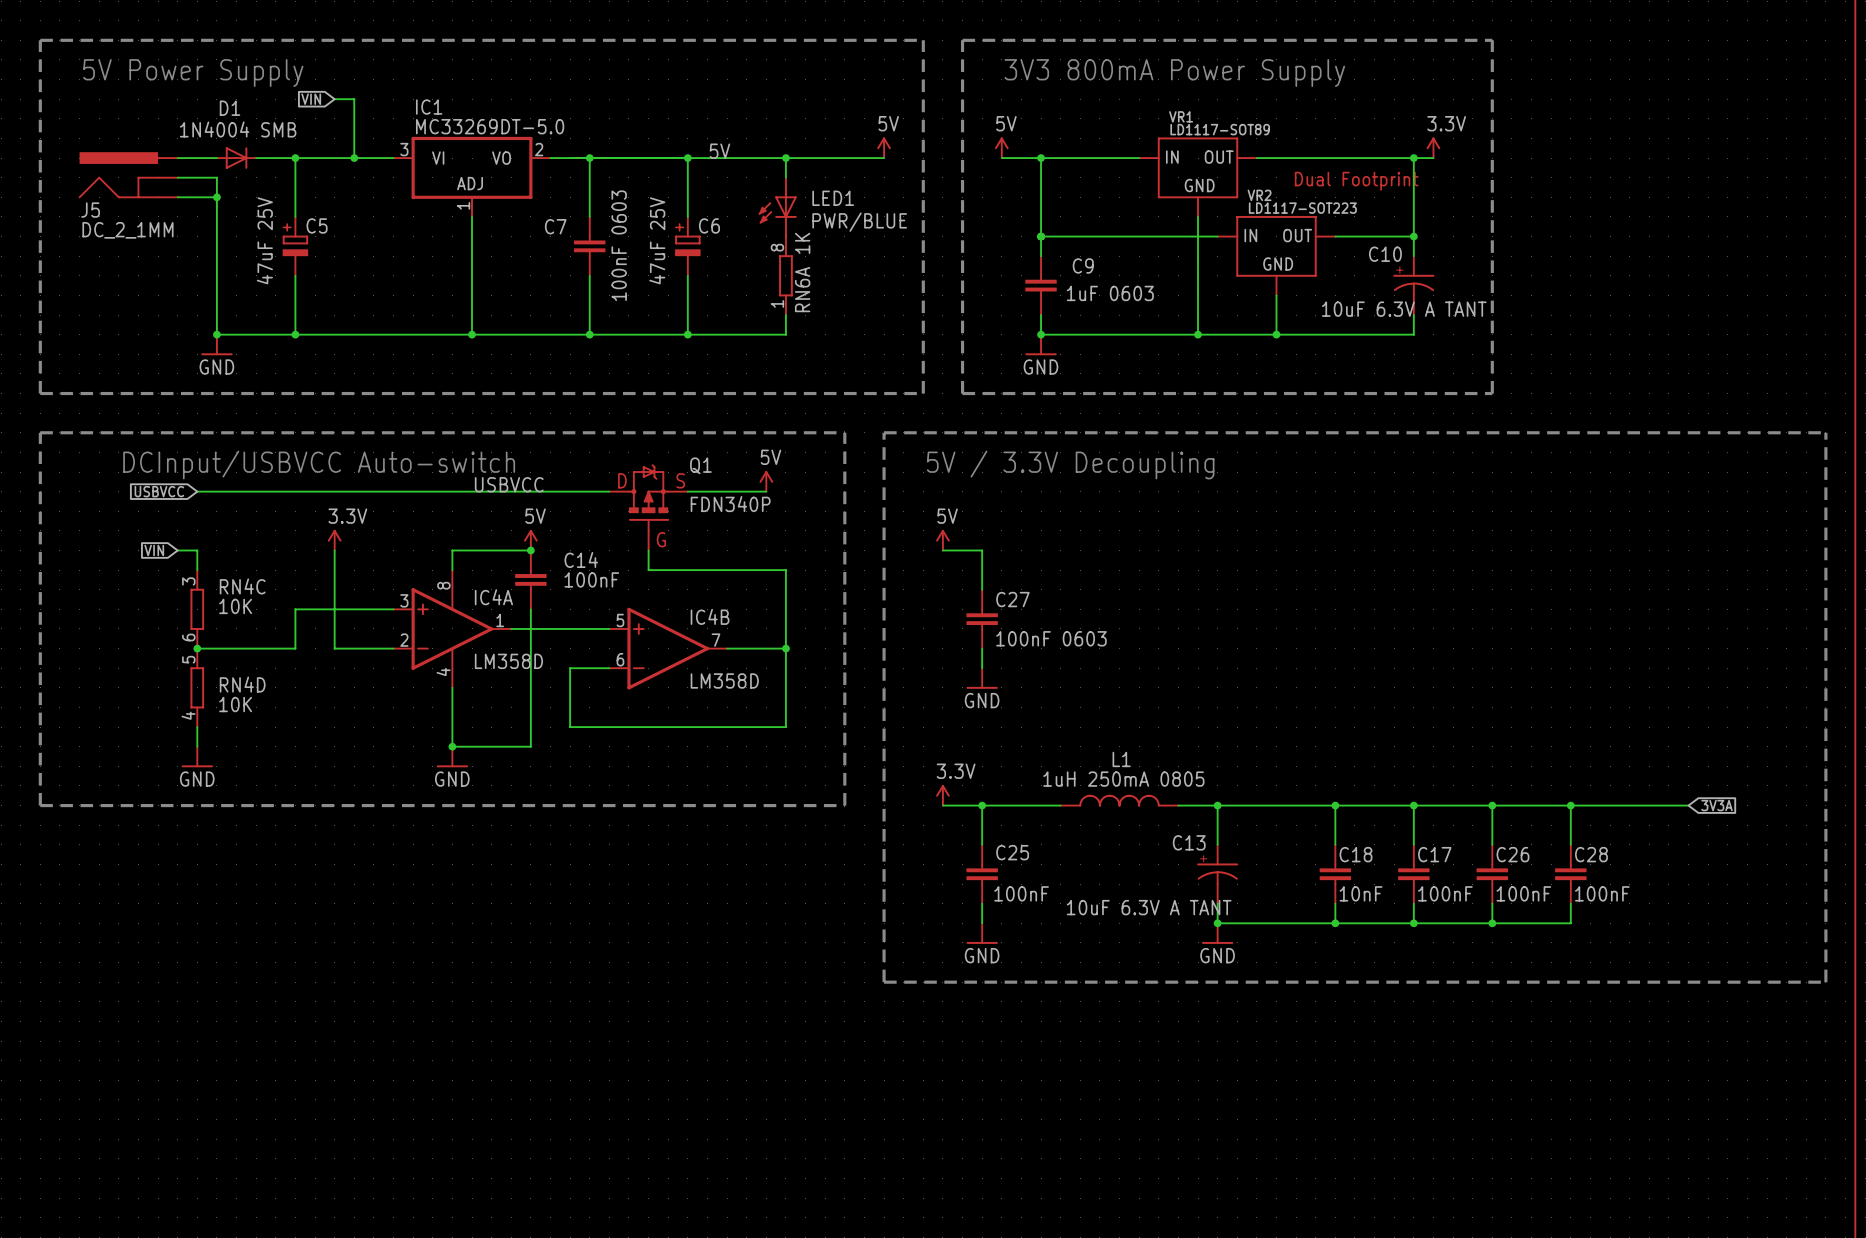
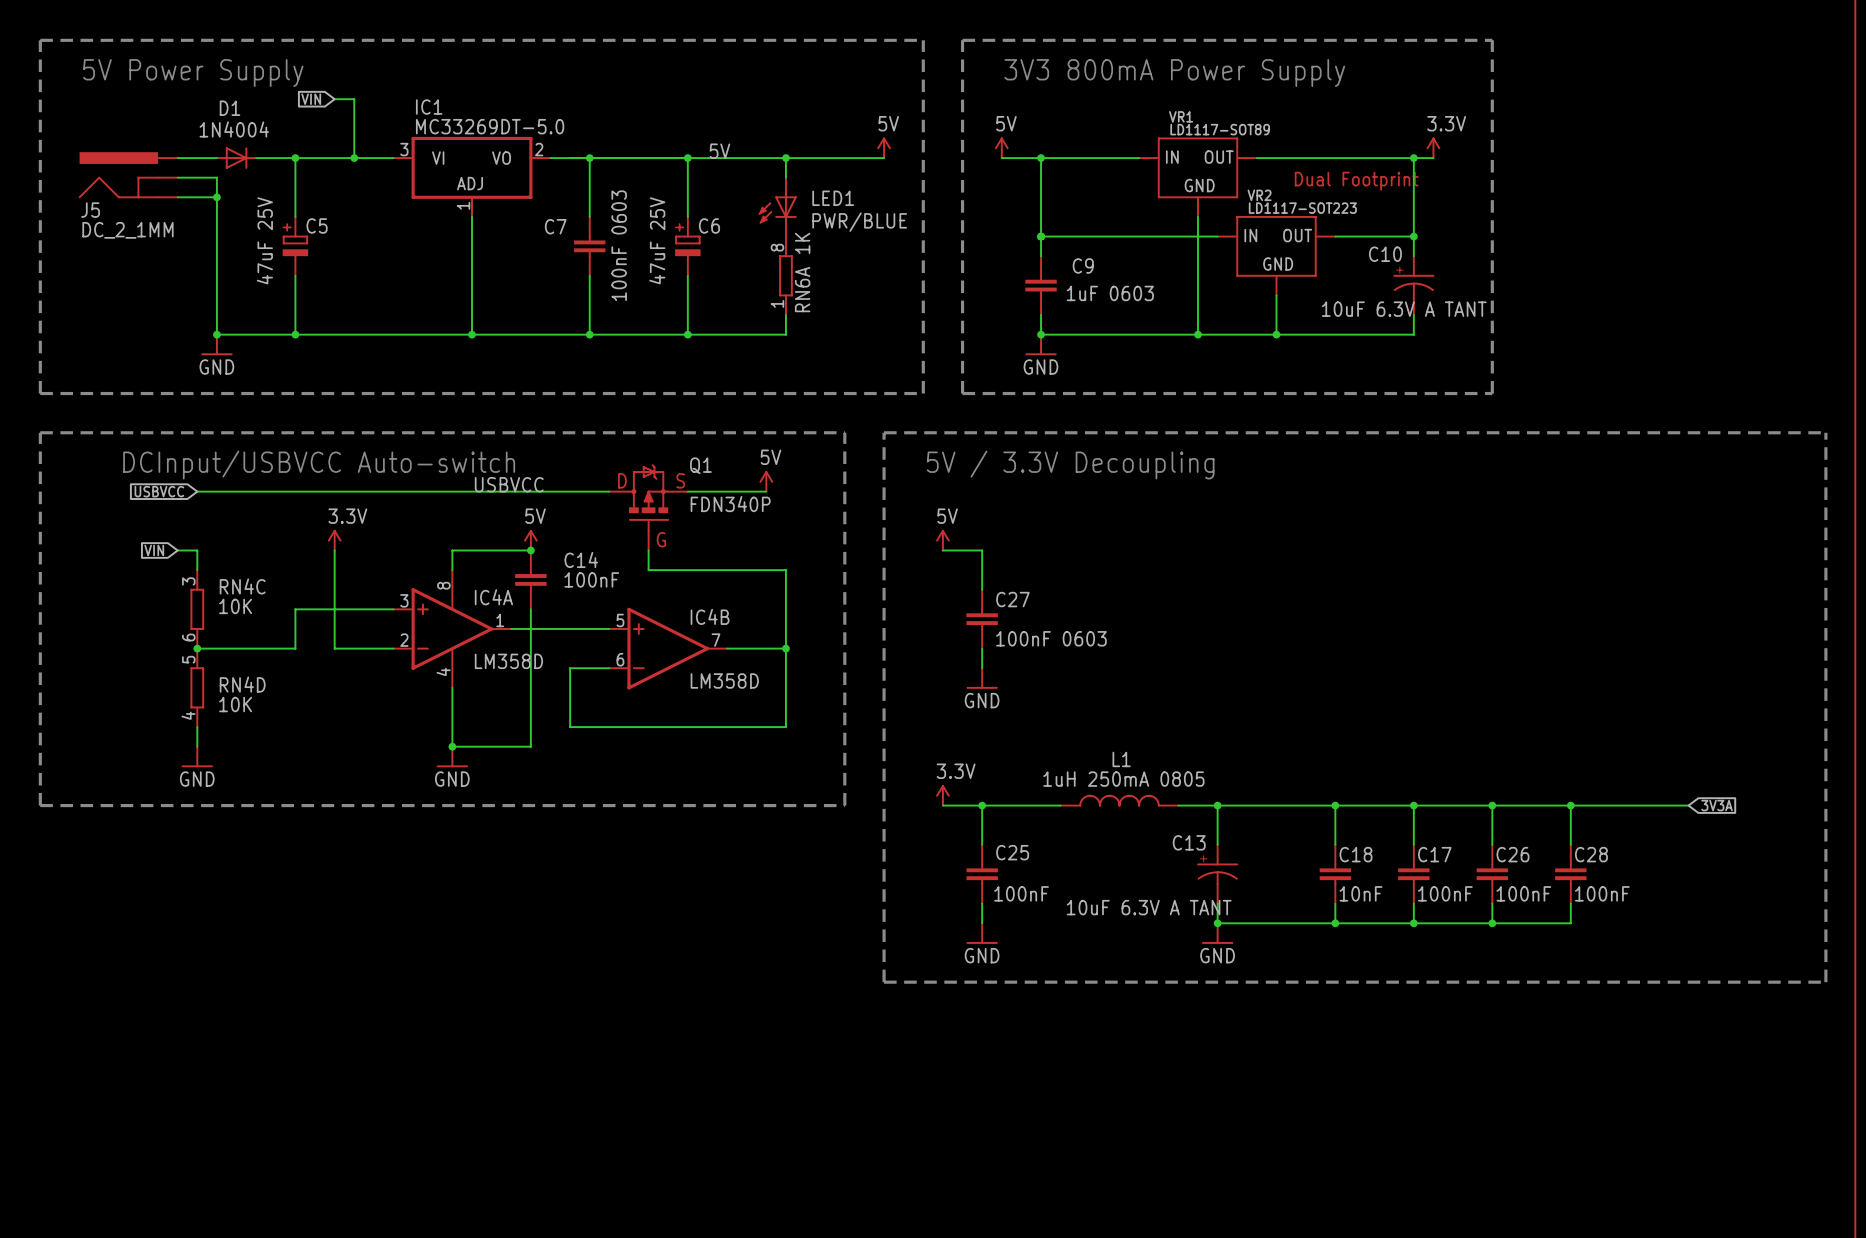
D1 value: 1N4004 SMB (238, 129) -> 1N4004 (234, 129)

